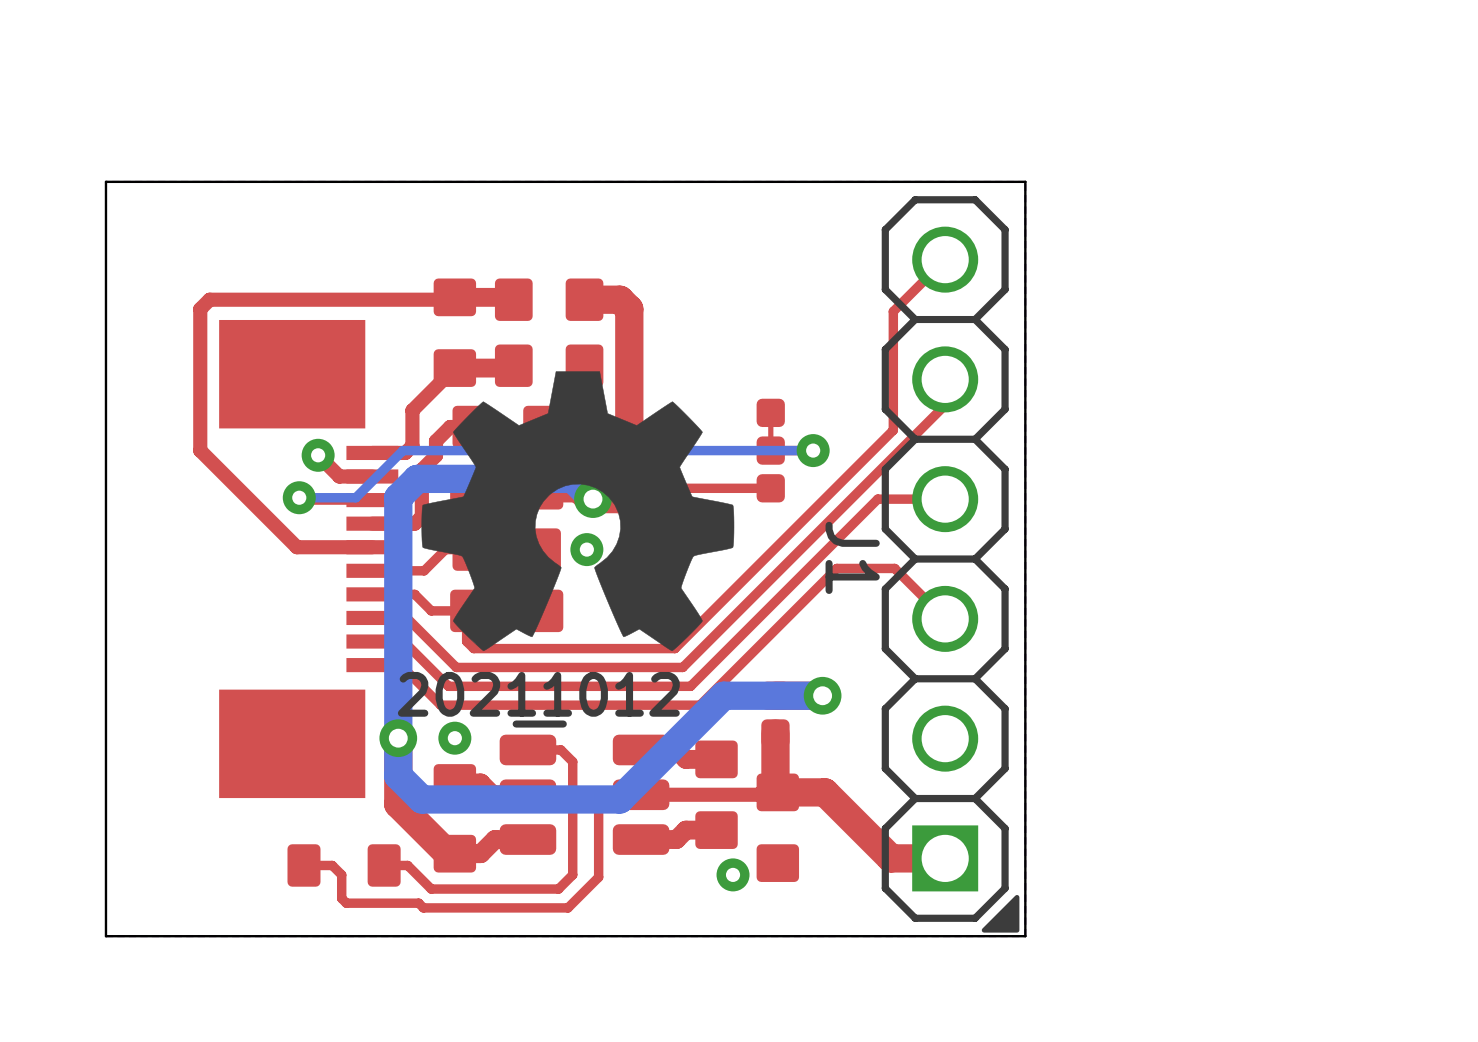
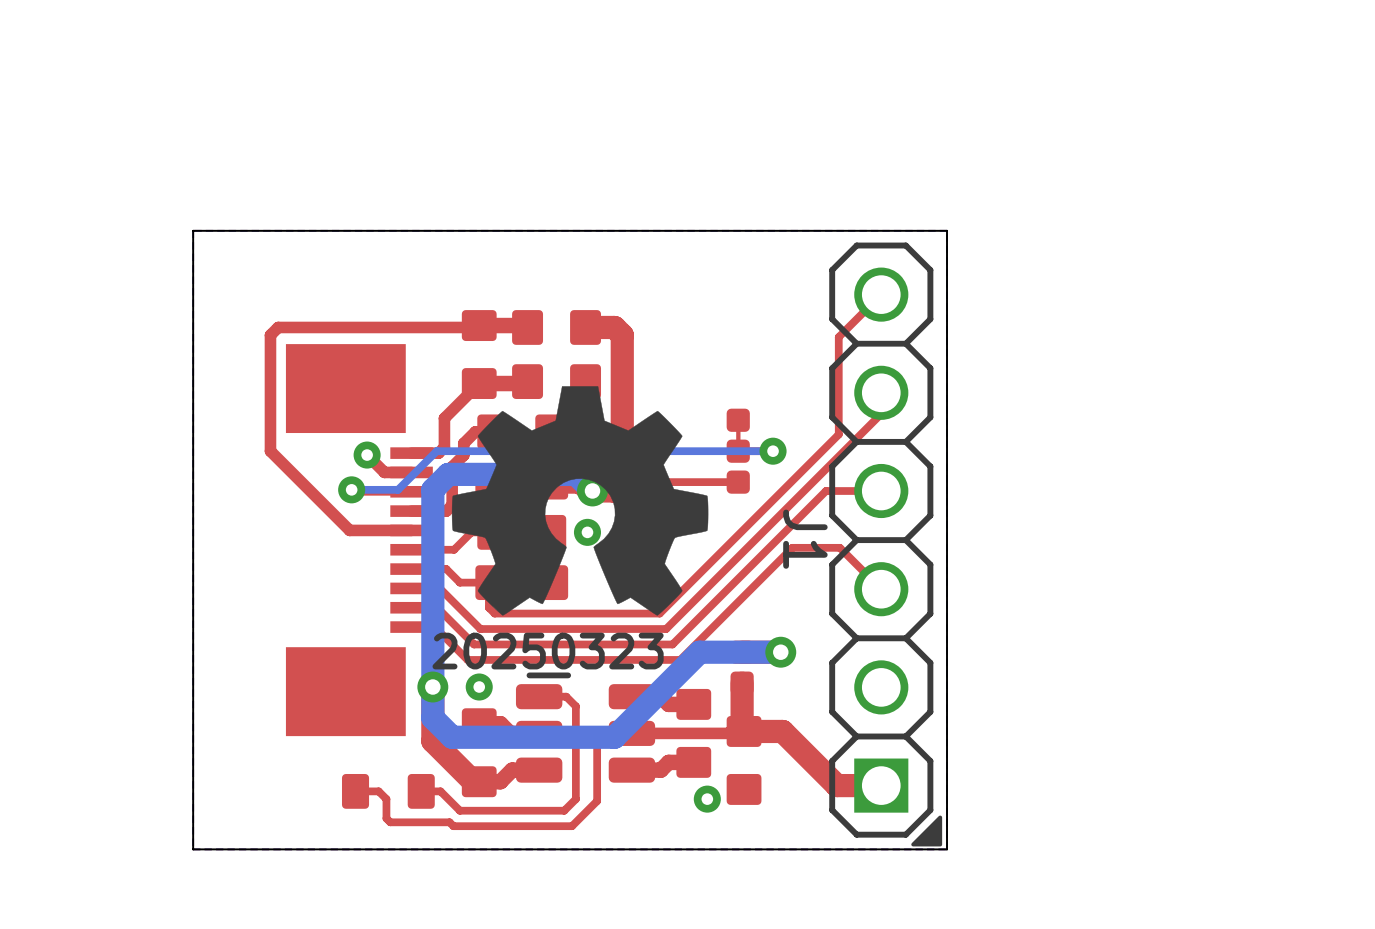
drawing shape: [397, 671, 680, 728] -> [432, 632, 664, 679]

